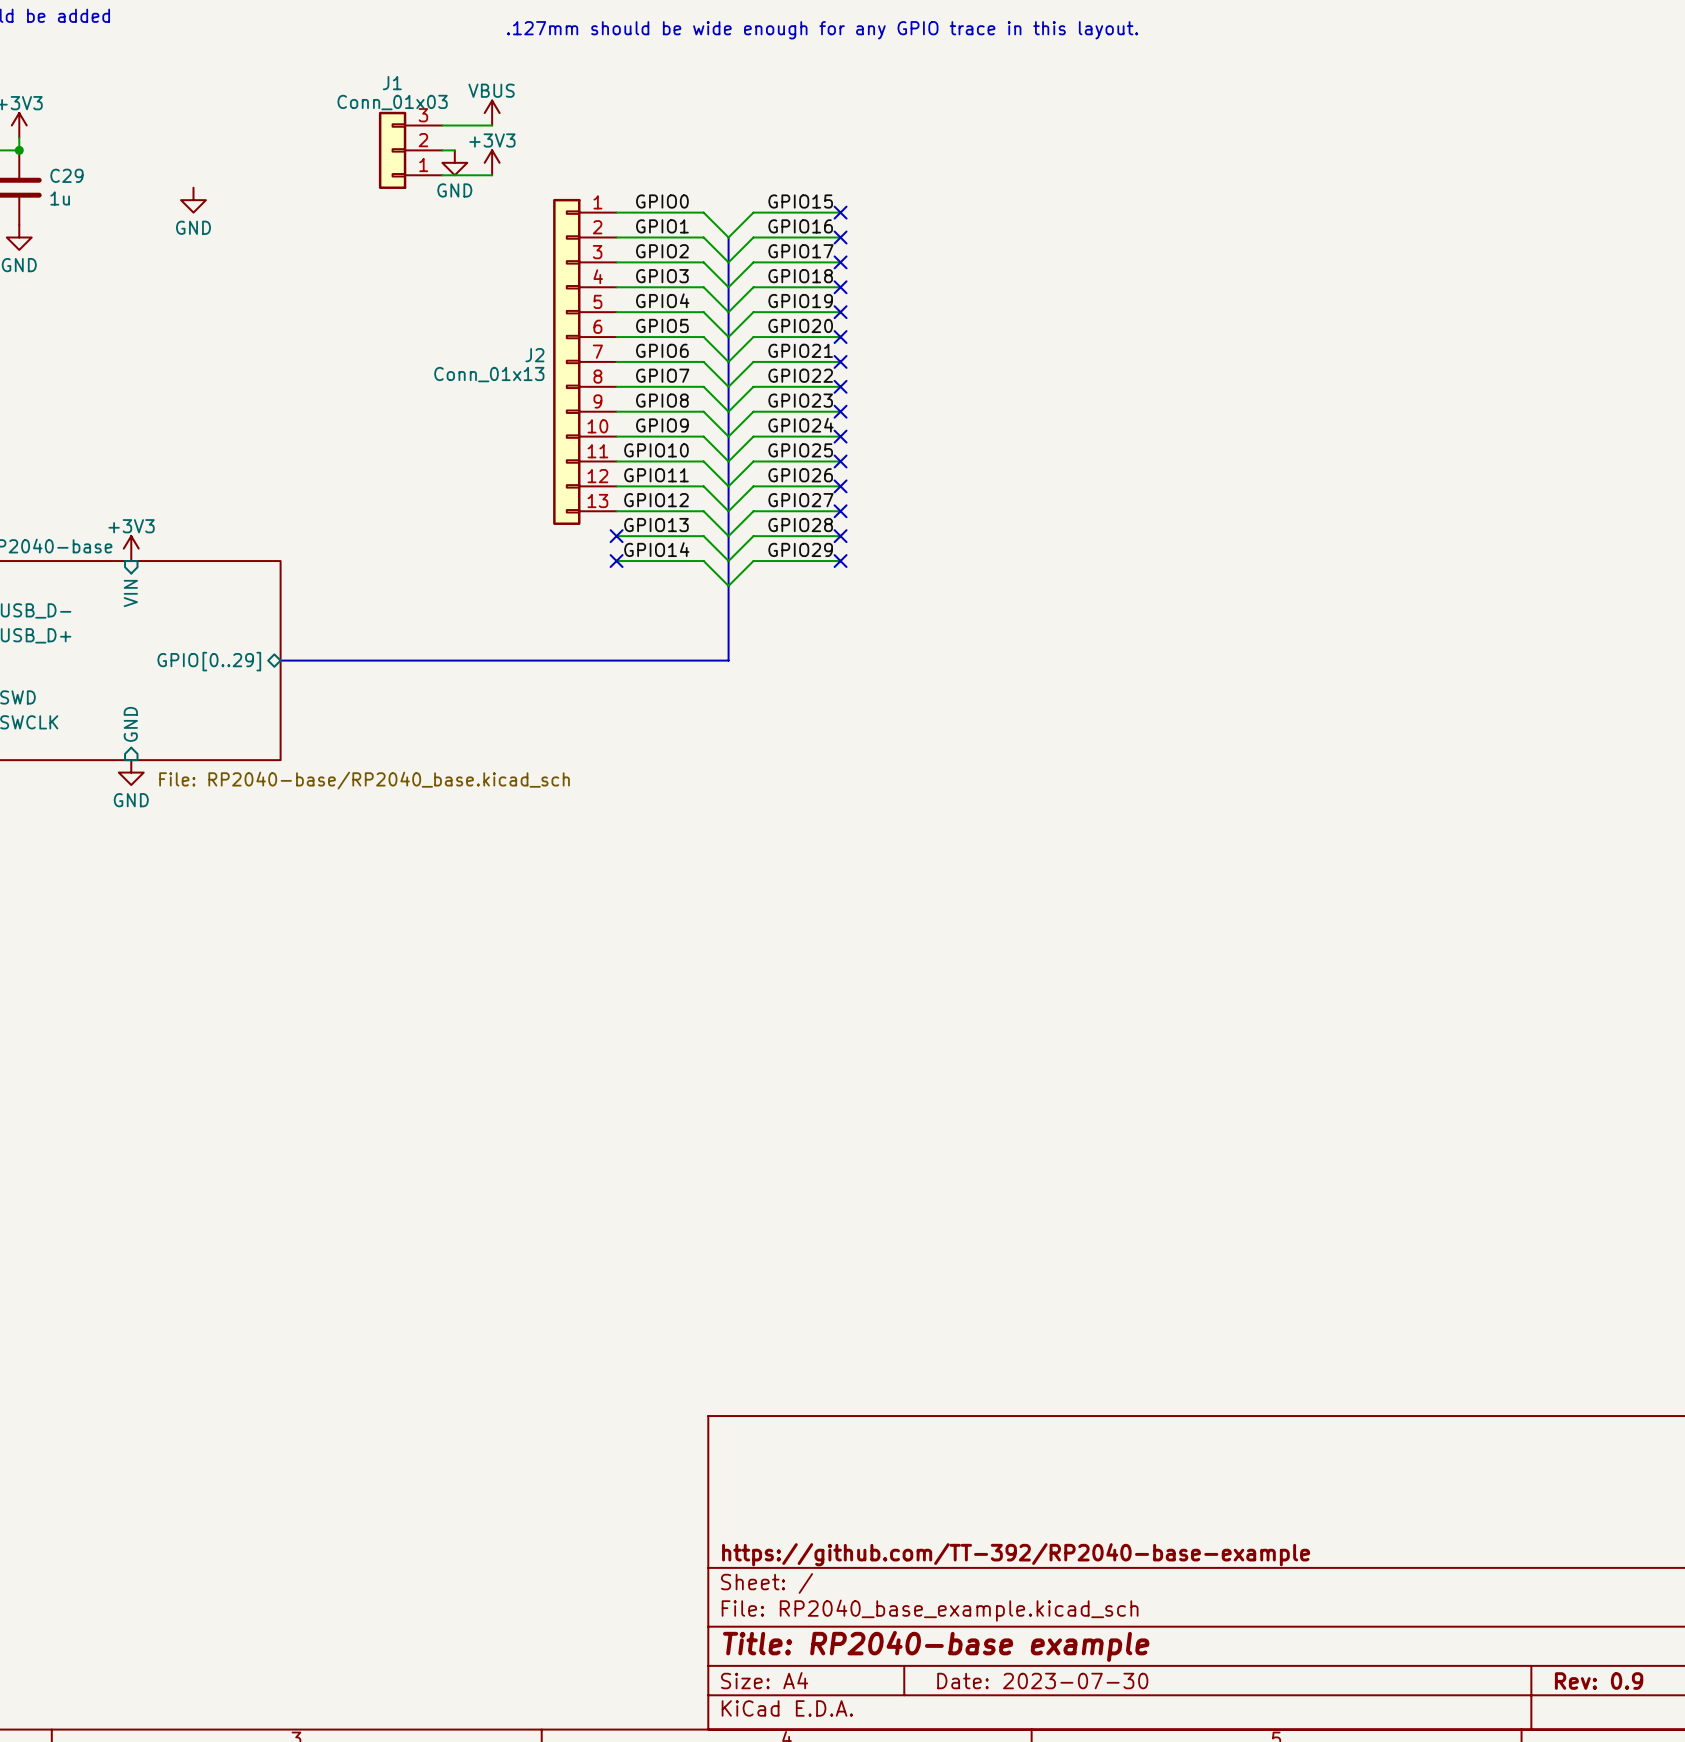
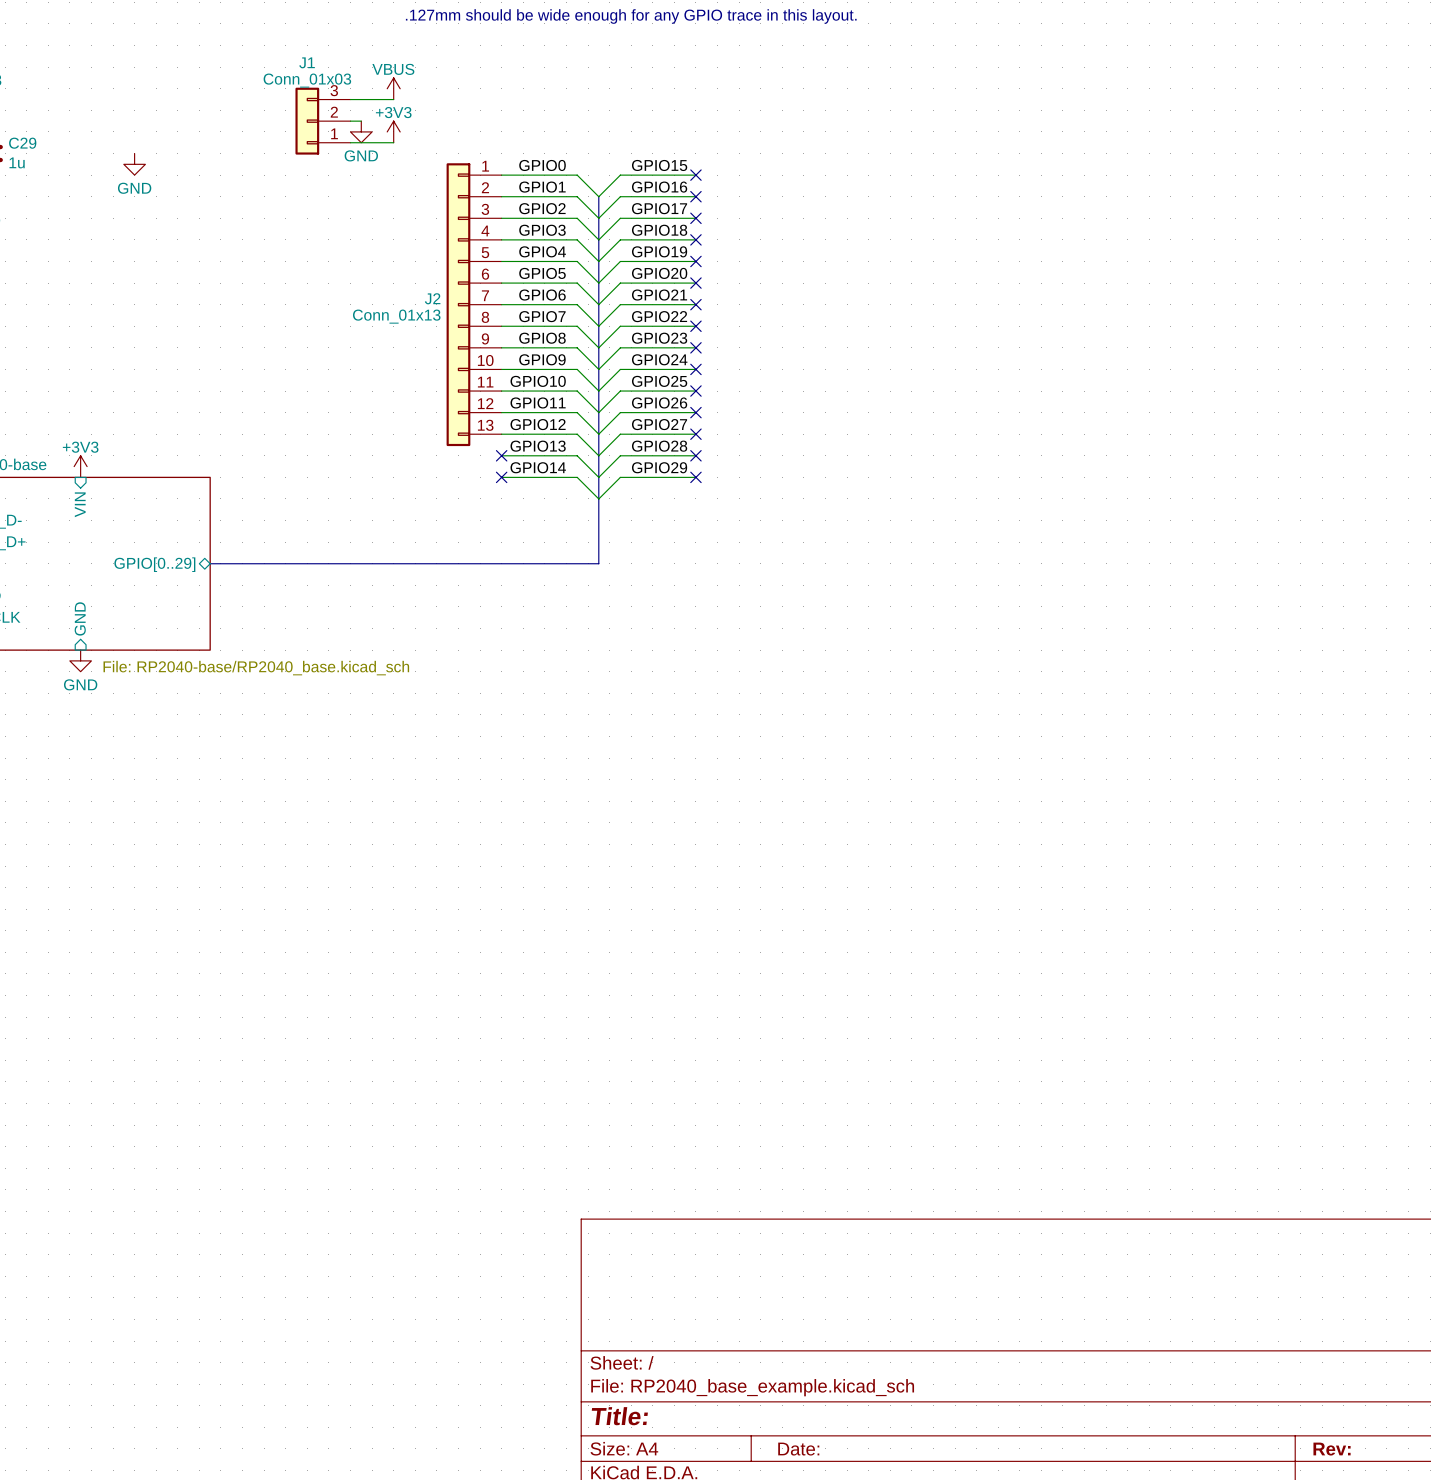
title block: https://github.com/TT-392/RP2040-base-example (1016, 1554) -> none
title block: Title: RP2040-base example (936, 1646) -> Title: (619, 1416)
title block: Date: 2023-07-30 (1042, 1681) -> Date: (798, 1449)
title block: Rev: 0.9 (1599, 1681) -> Rev: (1332, 1449)

